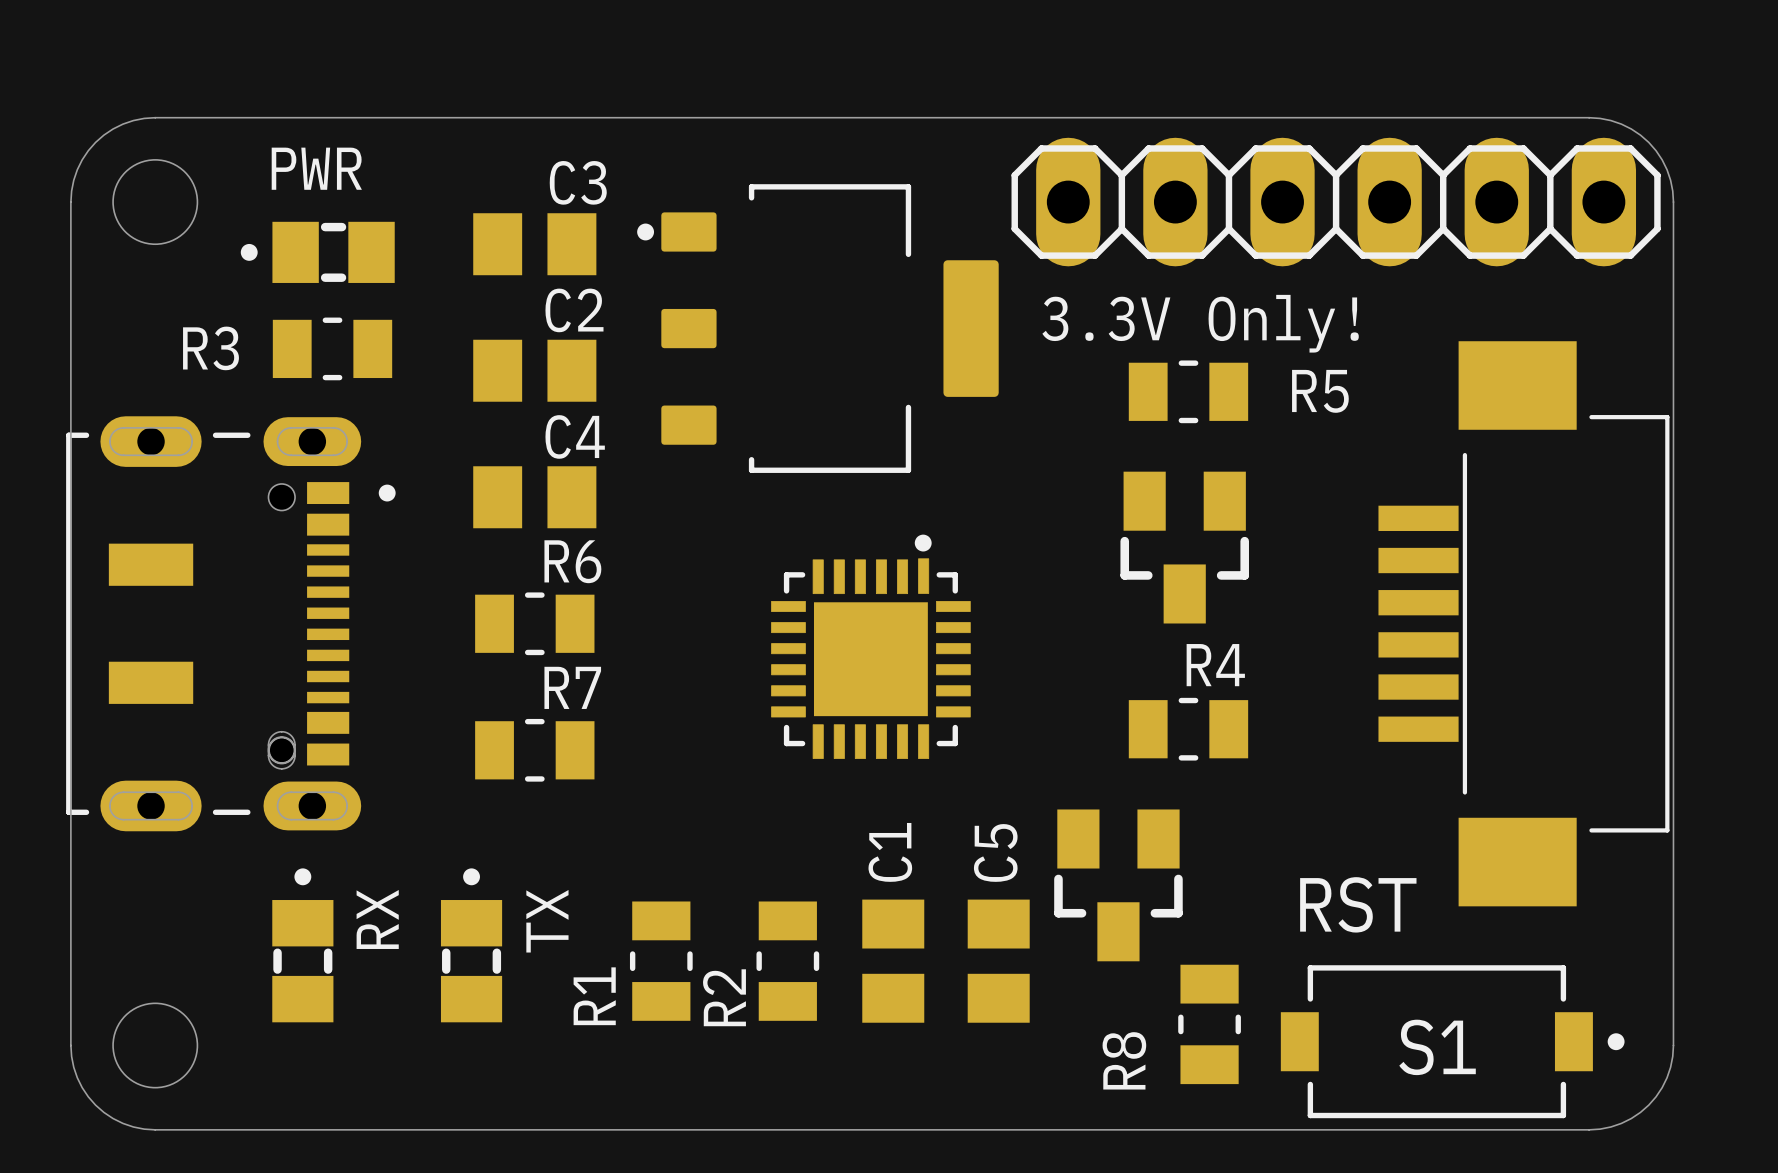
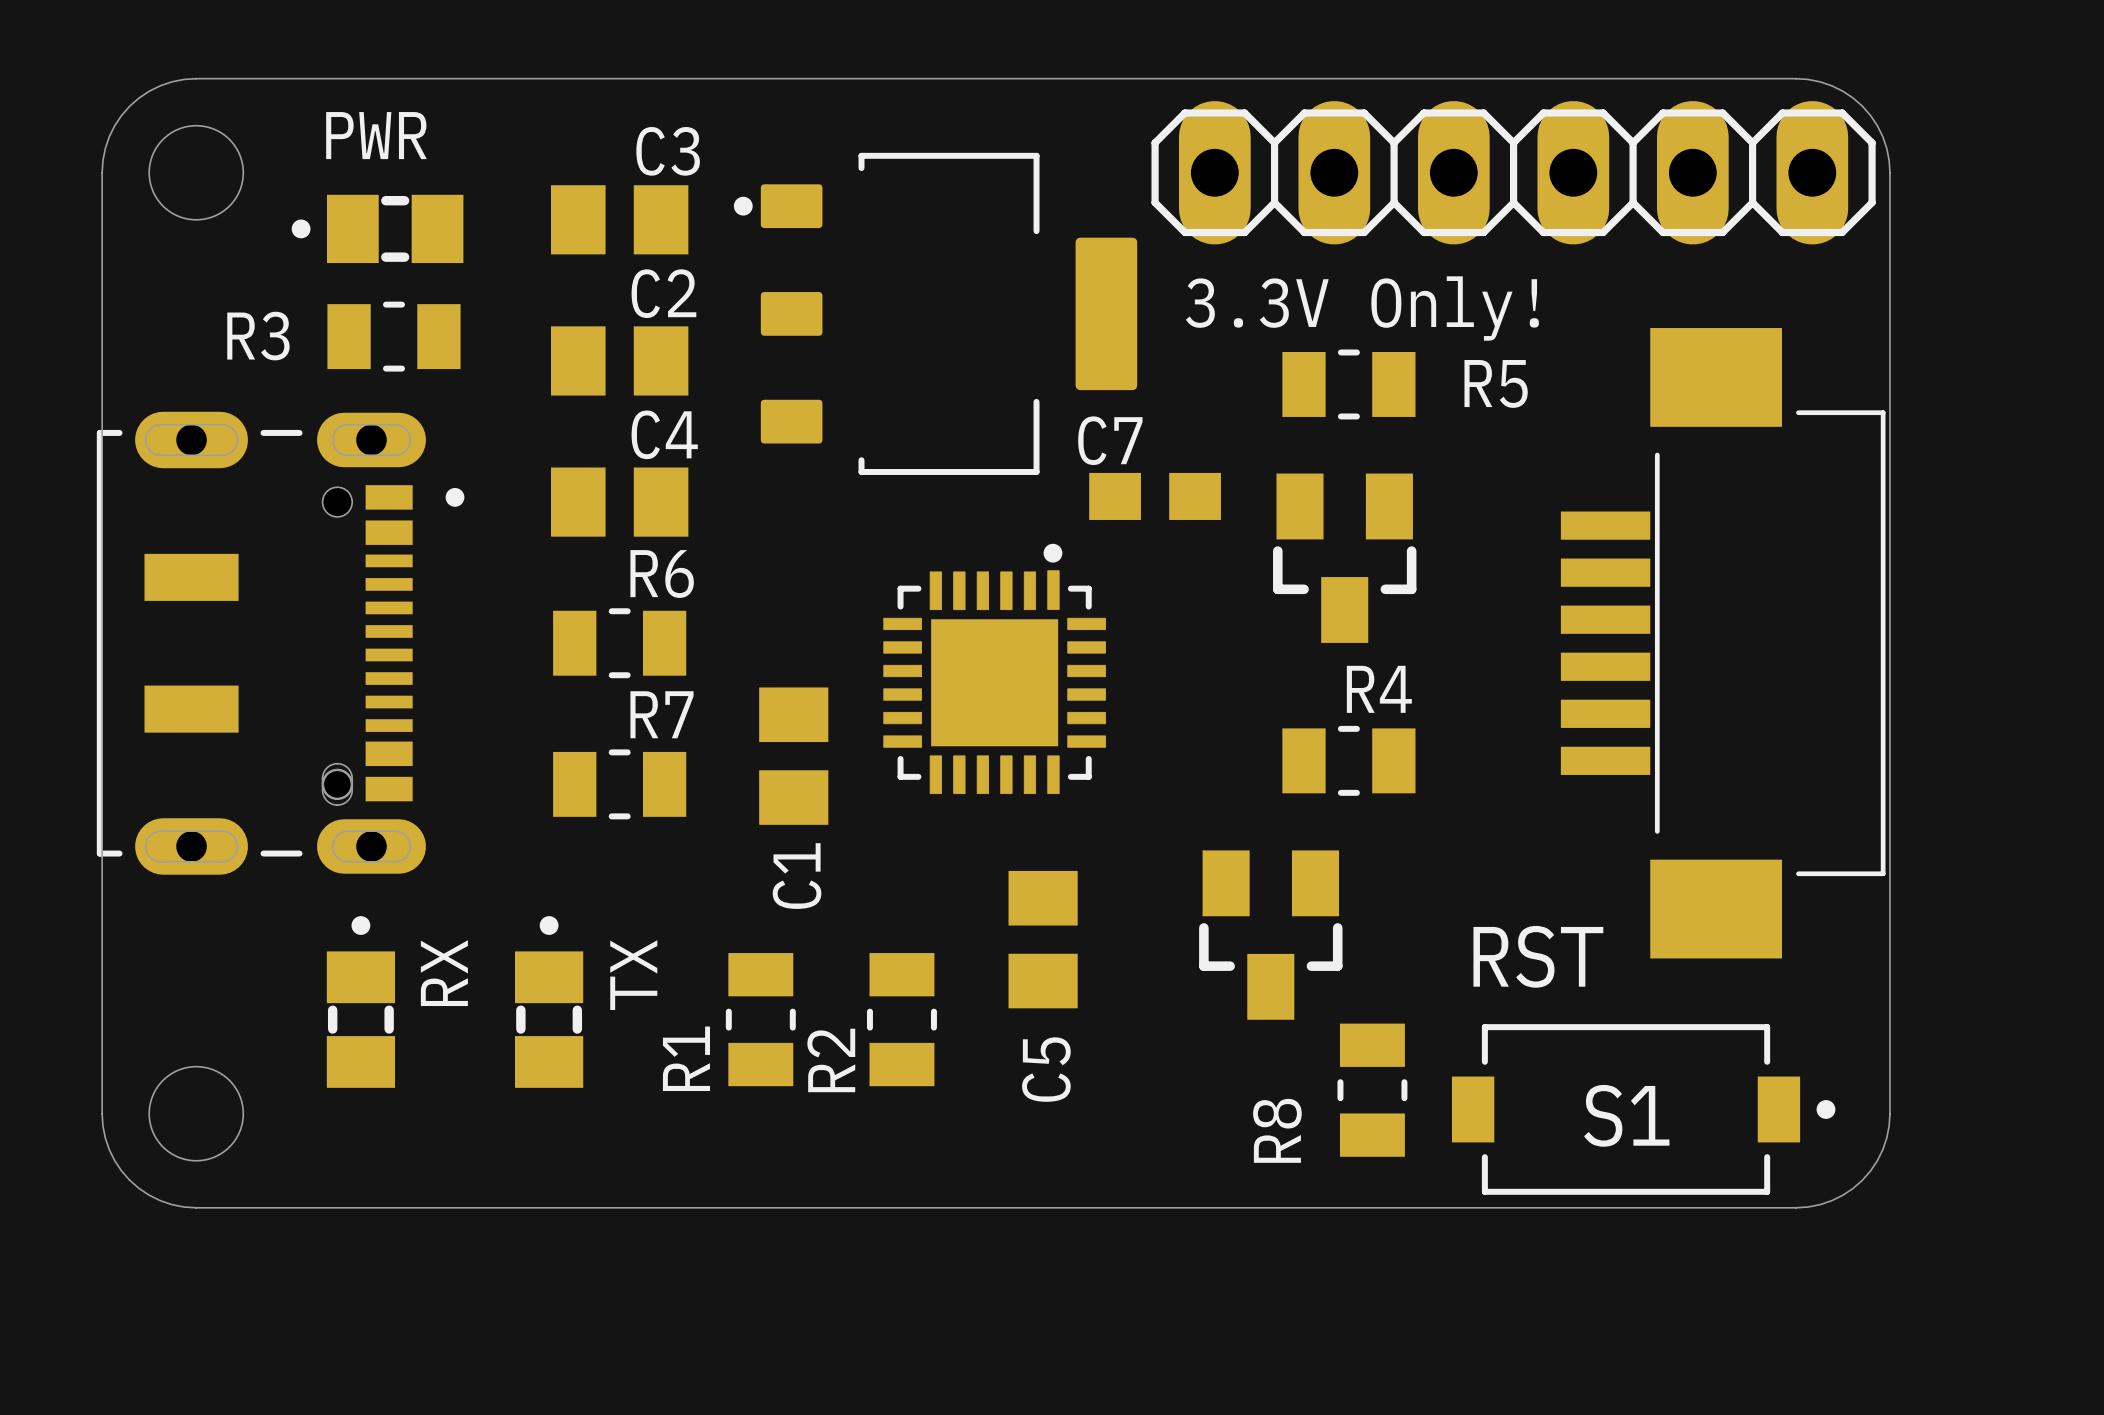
C7: none -> (1155, 496)
C1 name position: C1 (890, 852) -> C1 (797, 876)
C5 name position: C5 (995, 852) -> C5 (1046, 1069)
C1 position: (893, 961) -> (793, 756)
C5 position: (998, 961) -> (1043, 939)

